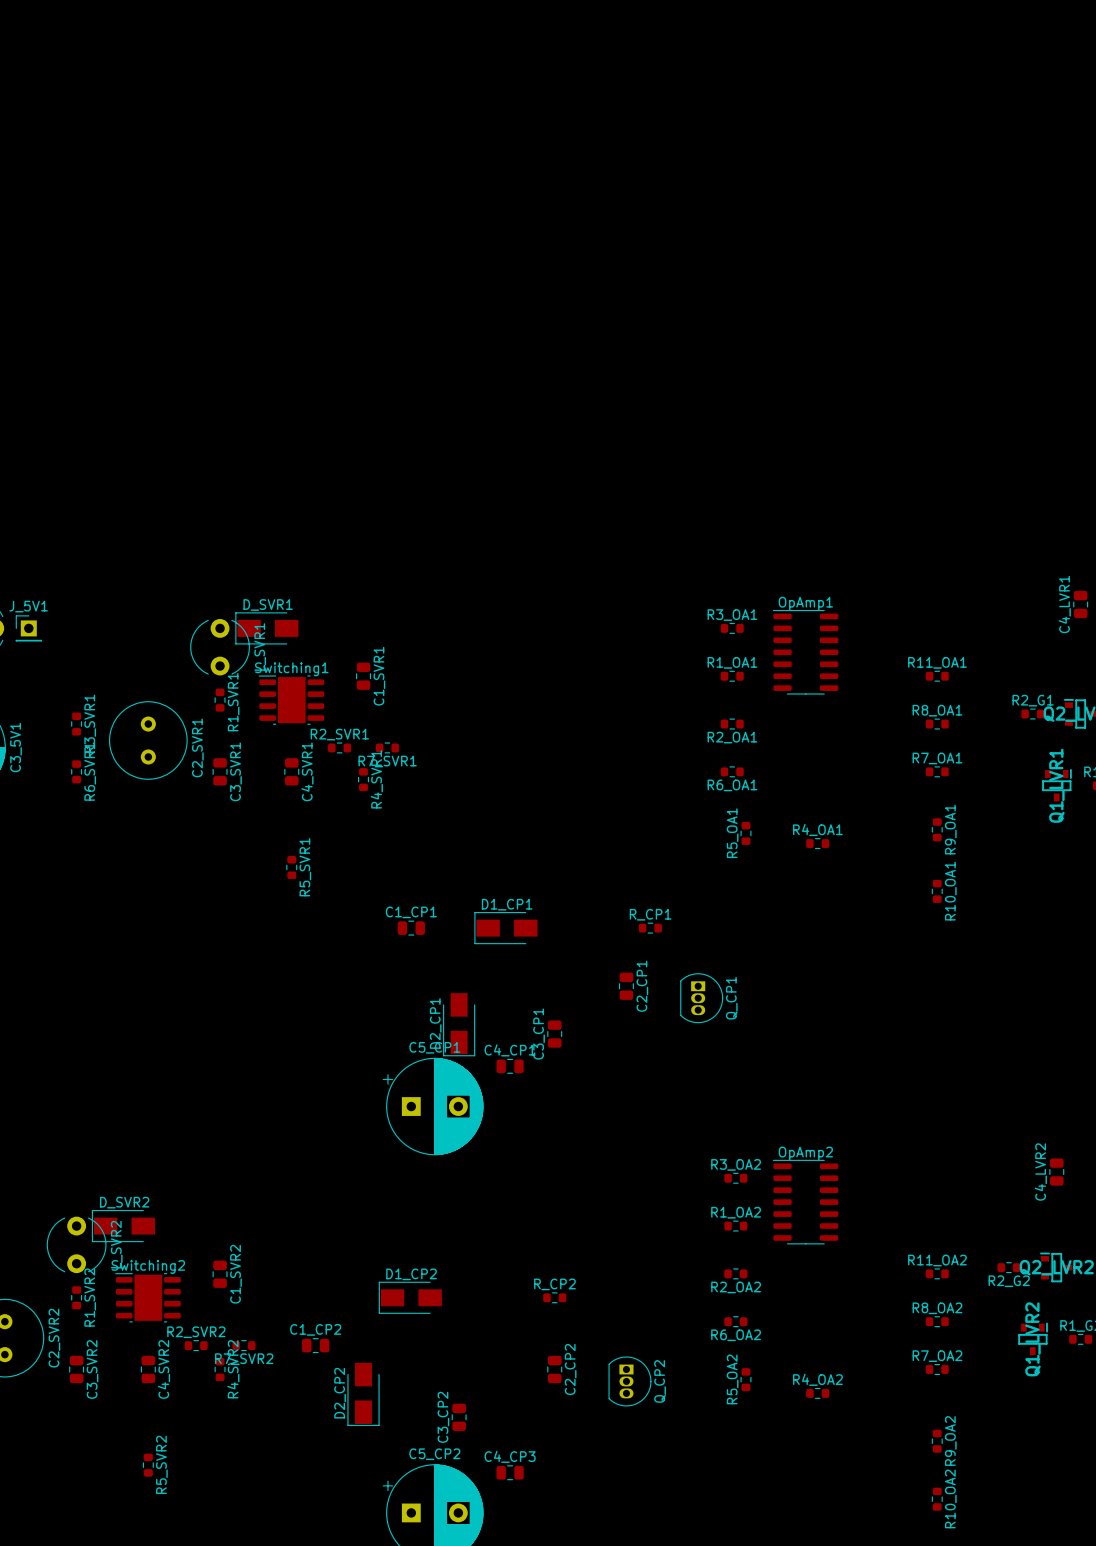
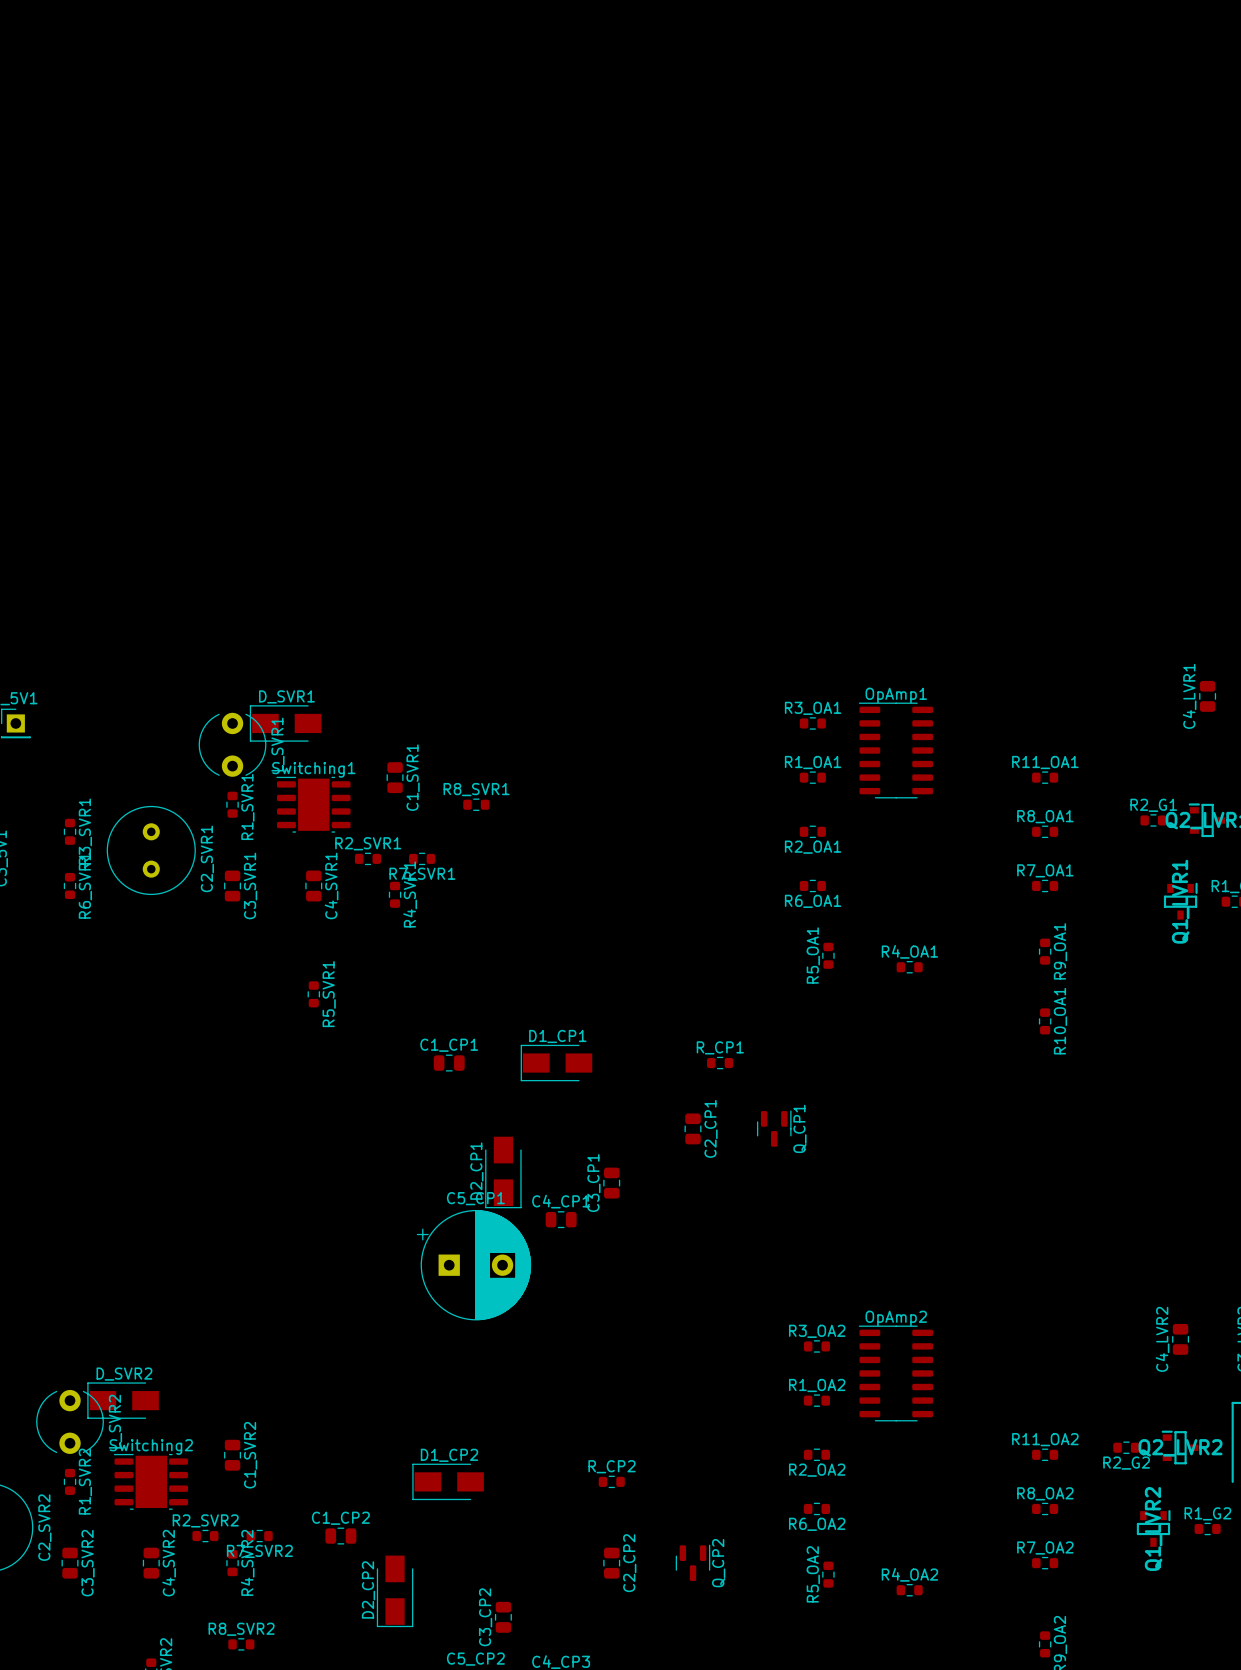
R8_SVR1: none -> (476, 804)
Q_CP1 footprint: [680, 973, 724, 1024] -> [756, 1110, 792, 1147]
Q_CP2 footprint: [608, 1356, 652, 1407] -> [675, 1544, 711, 1581]
R8_SVR2: none -> (241, 1644)

